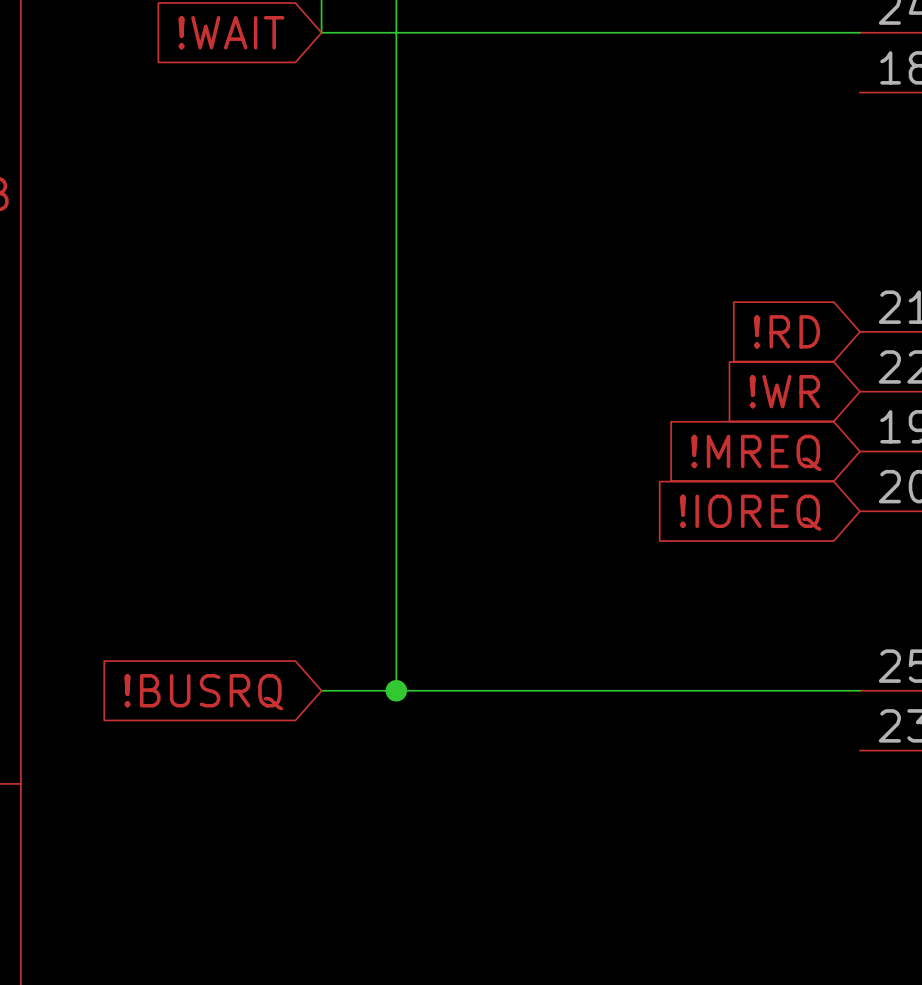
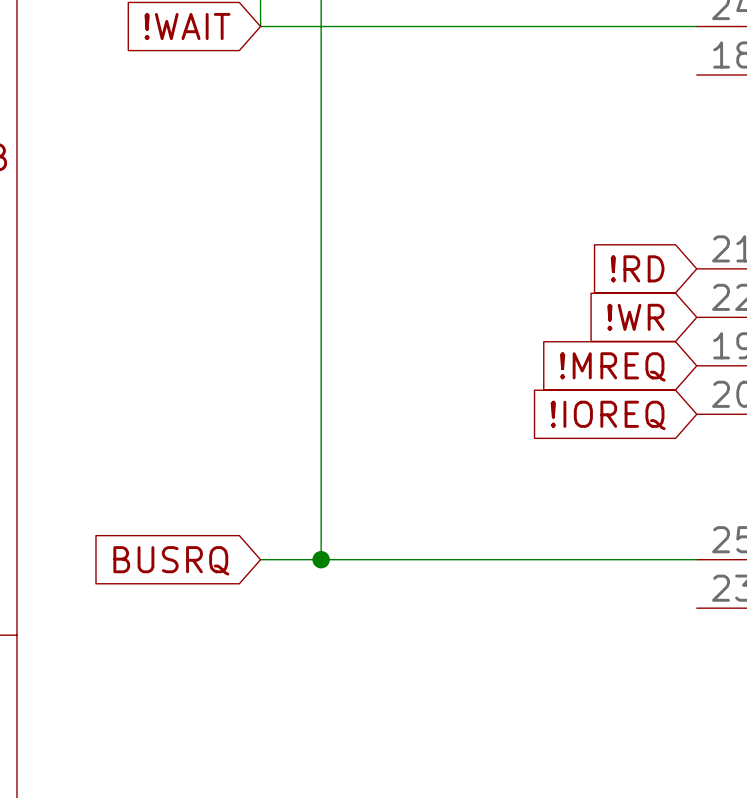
global label: !BUSRQ (203, 692) -> BUSRQ (171, 560)

